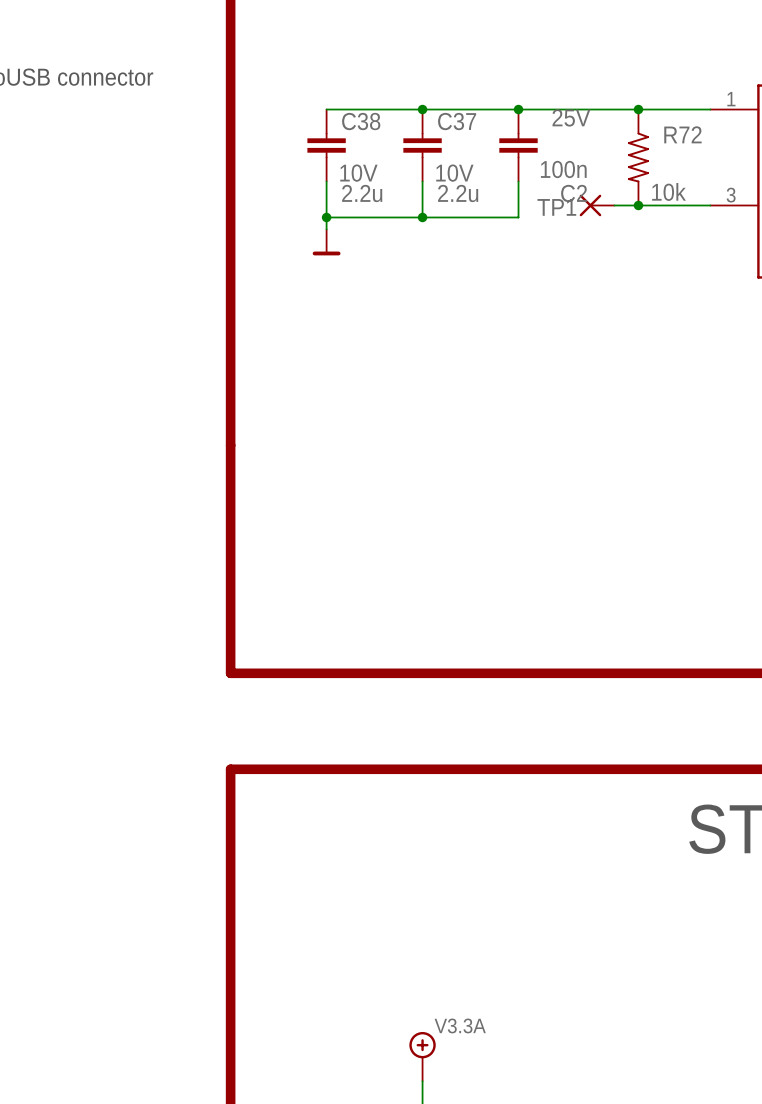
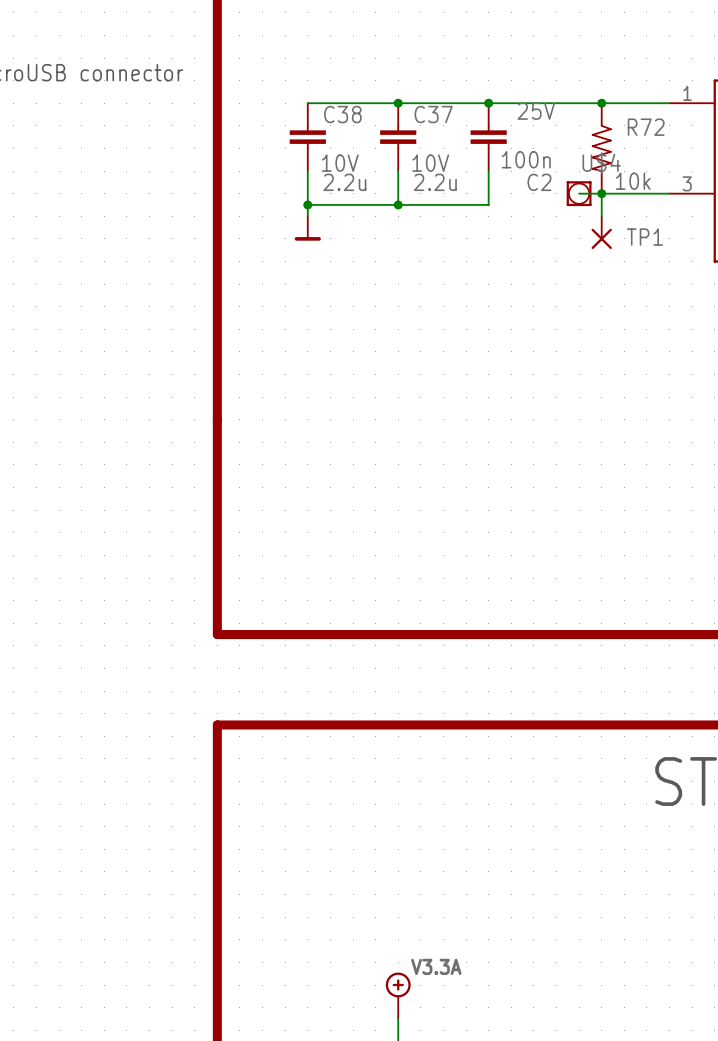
TP1 rotation: 0° (590, 205) -> 90° counterclockwise (601, 238)
TP1 position: (597, 205) -> (601, 232)
U$4: none -> (579, 193)
wire: none -> (601, 193) (601, 216)
TP1 name position: TP1 (556, 207) -> TP1 (644, 237)

